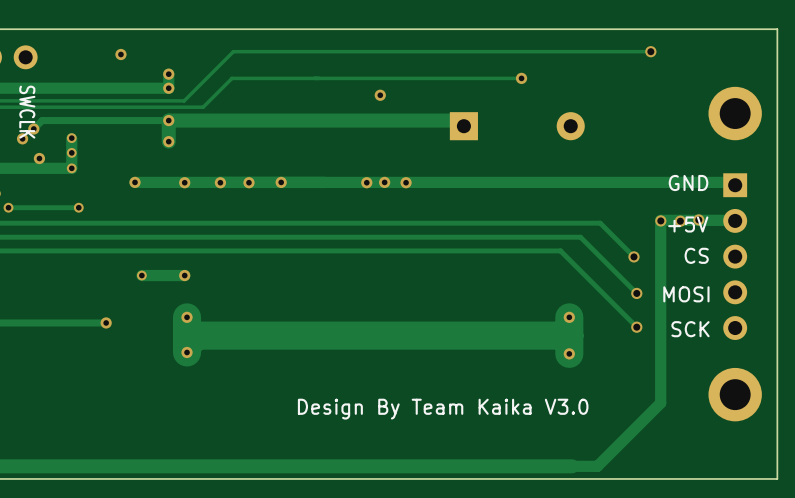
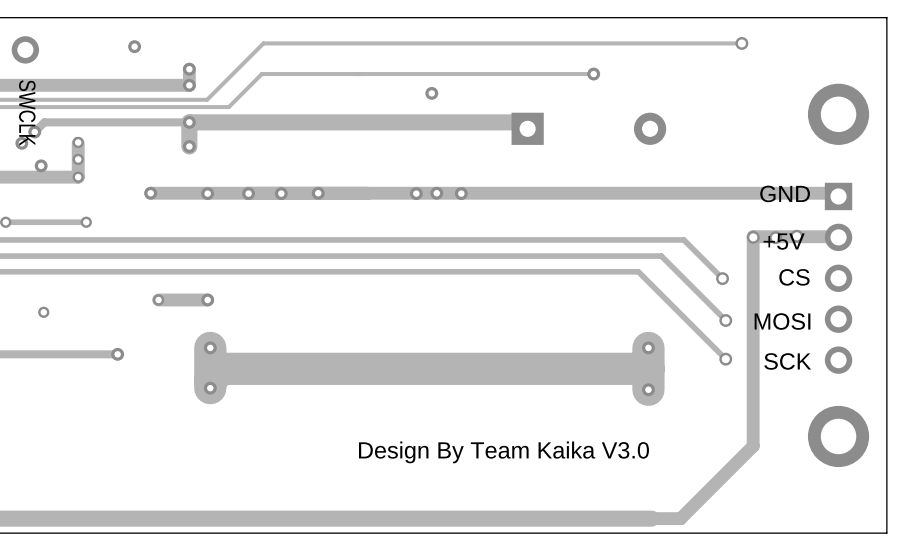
via: none -> (43, 312)

